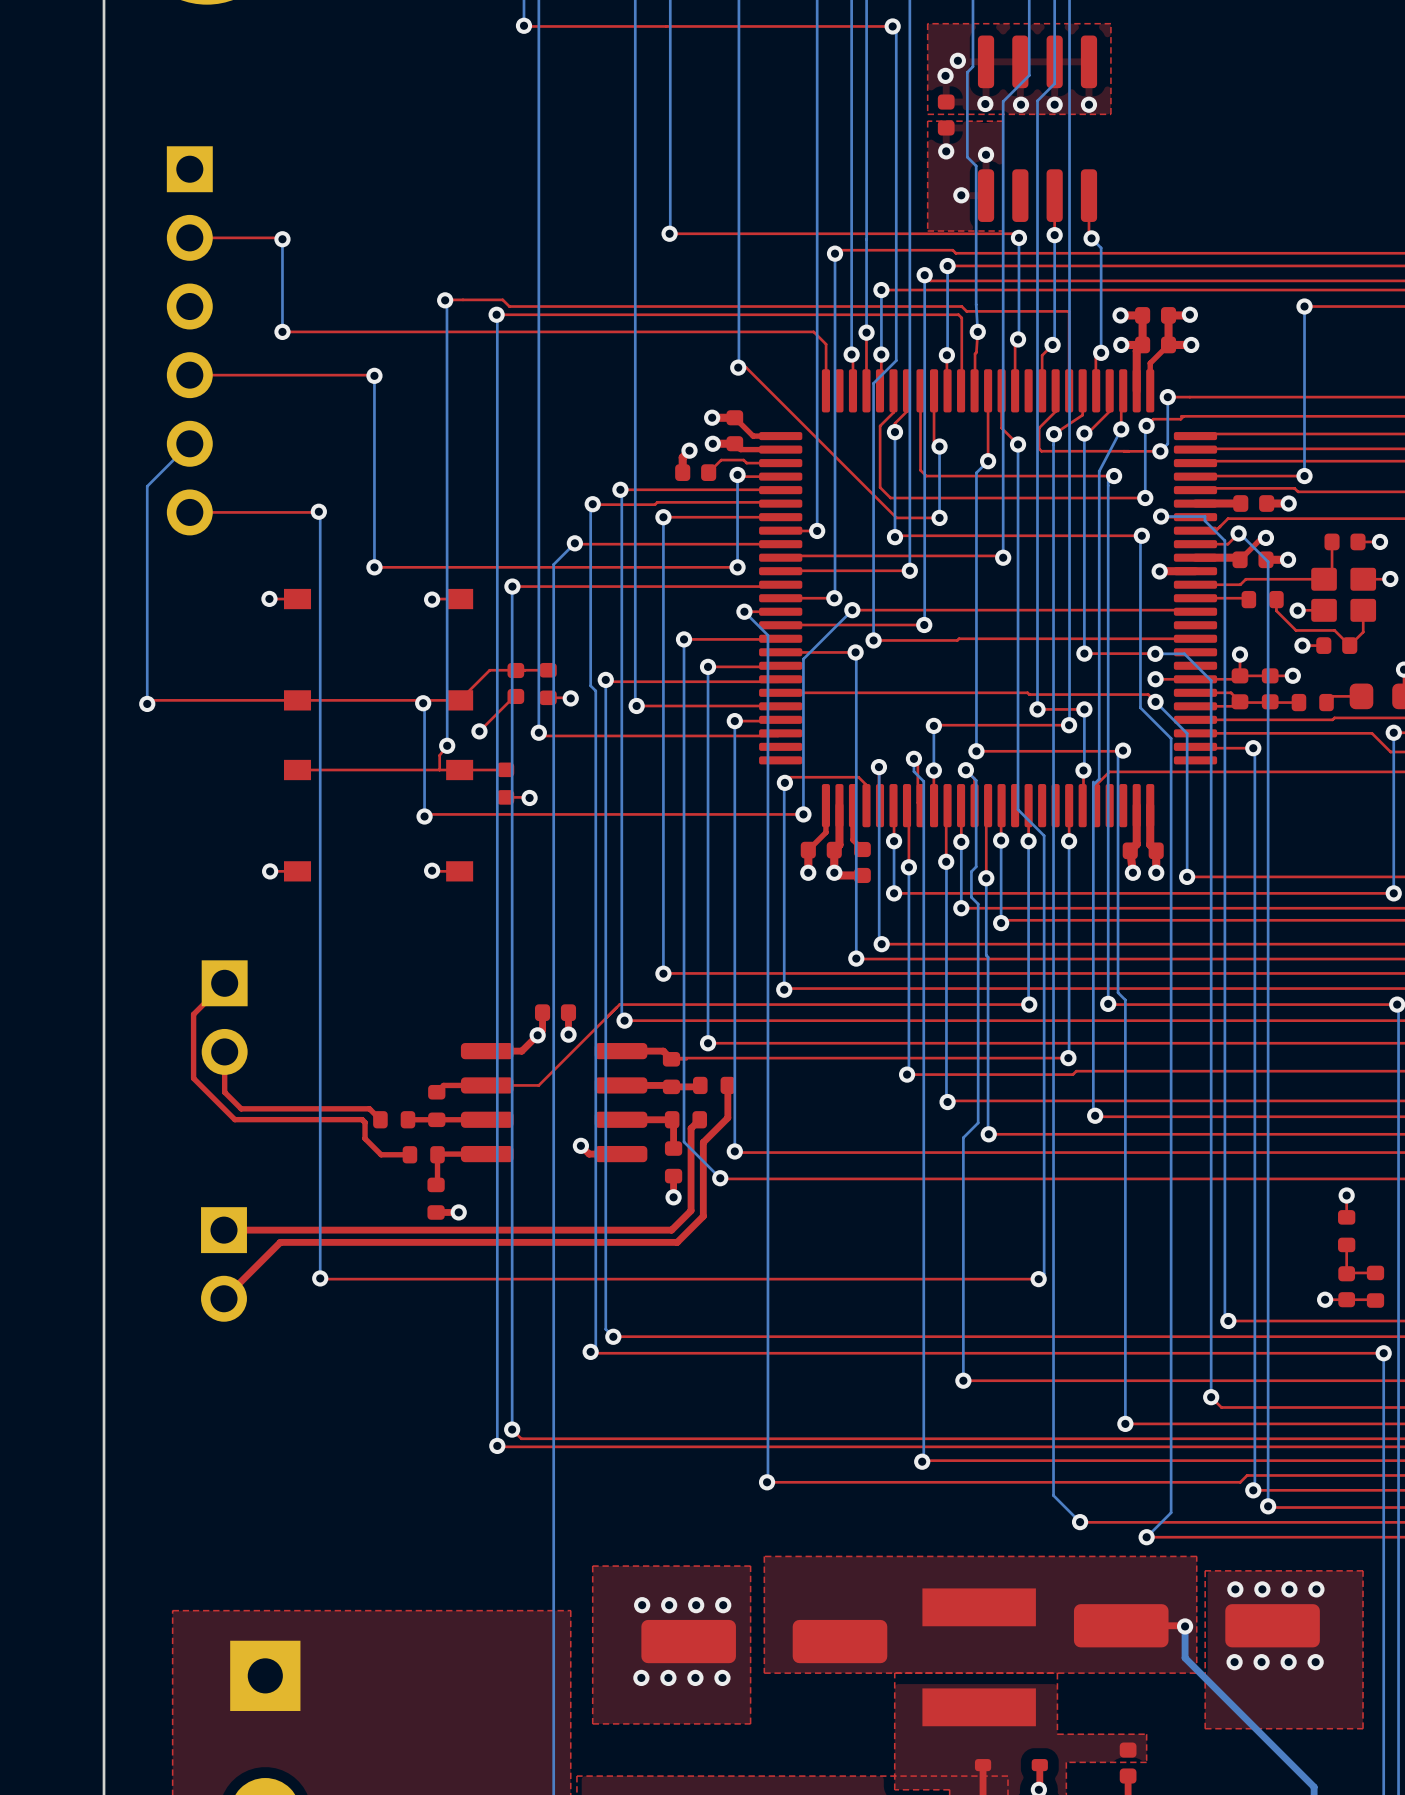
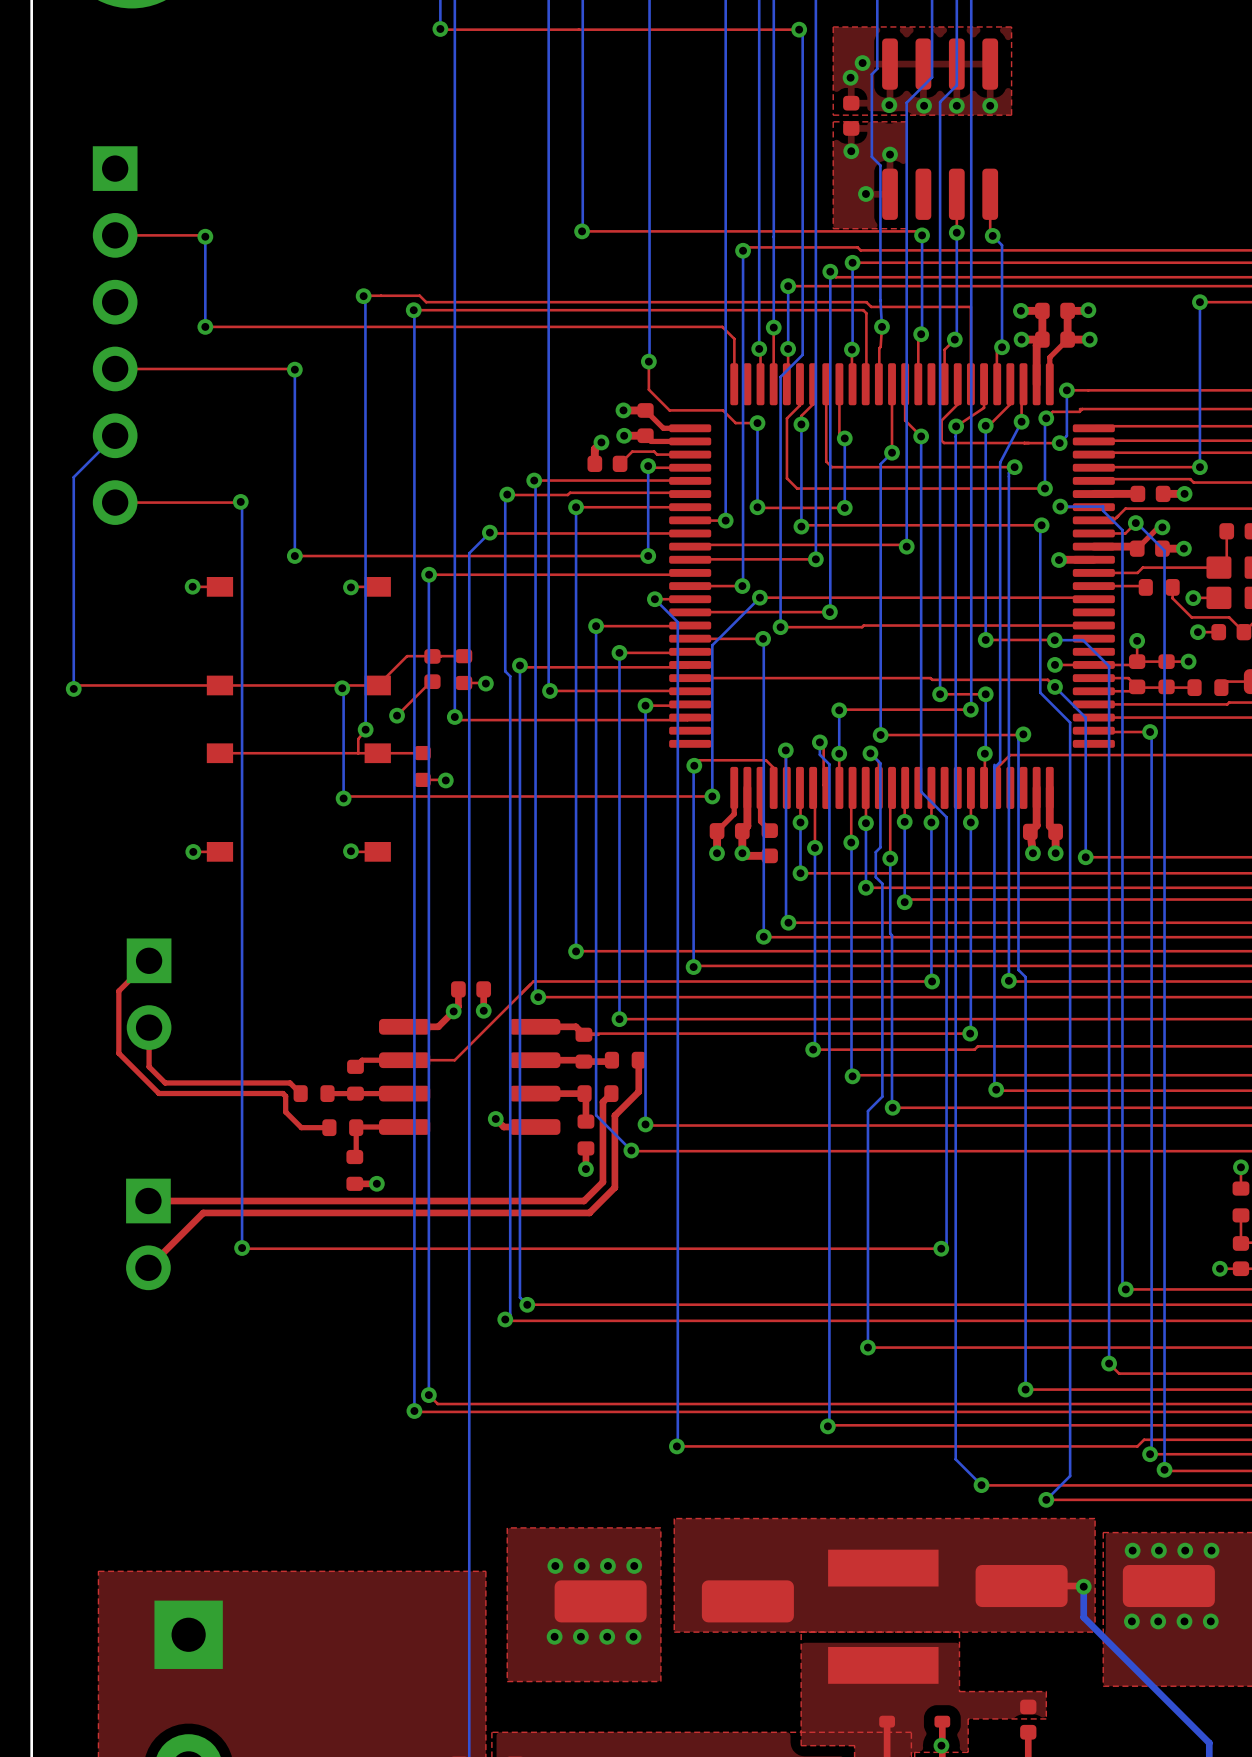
top track: (738, 367) (746, 367) (896, 517) -> (648, 361) (648, 389) (669, 410) (723, 410) (735, 423) (757, 423)
bottom track: none -> (757, 423) (757, 507)
via: none -> (757, 423)
top track: none -> (757, 507) (802, 507)
via: none -> (757, 507)

